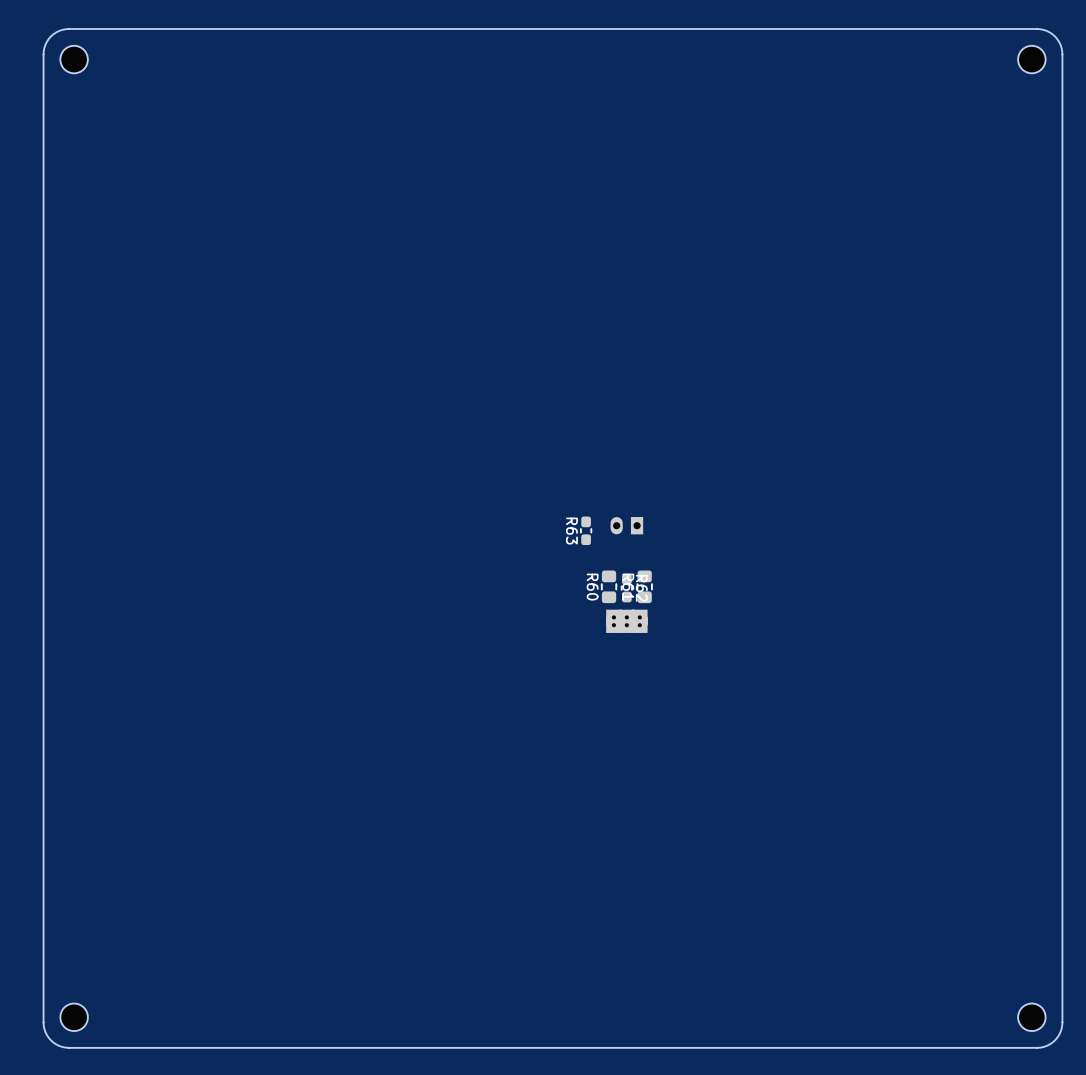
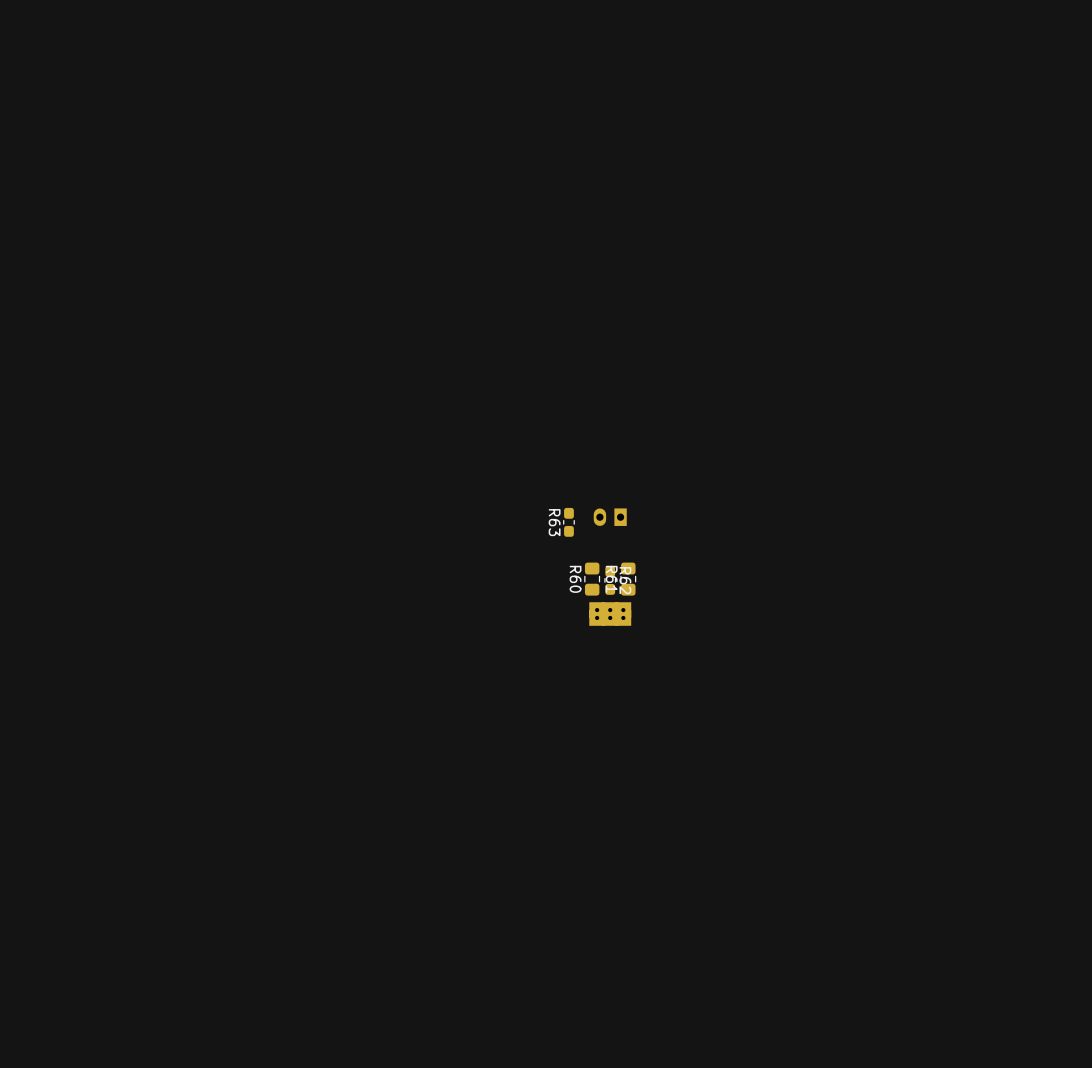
board edge: (1036, 28) (69, 28) (59, 30) (51, 36) (45, 44) (43, 54) (43, 1022) (45, 1032) (51, 1040) (59, 1045) (69, 1047) (1036, 1047) (1046, 1045) (1054, 1040) (1060, 1032) (1062, 1022) (1062, 54) (1060, 44) (1054, 36) (1046, 30) (1036, 28) -> none
part: (74, 59) -> none
part: (1031, 59) -> none
part: (74, 1017) -> none
part: (1031, 1017) -> none

